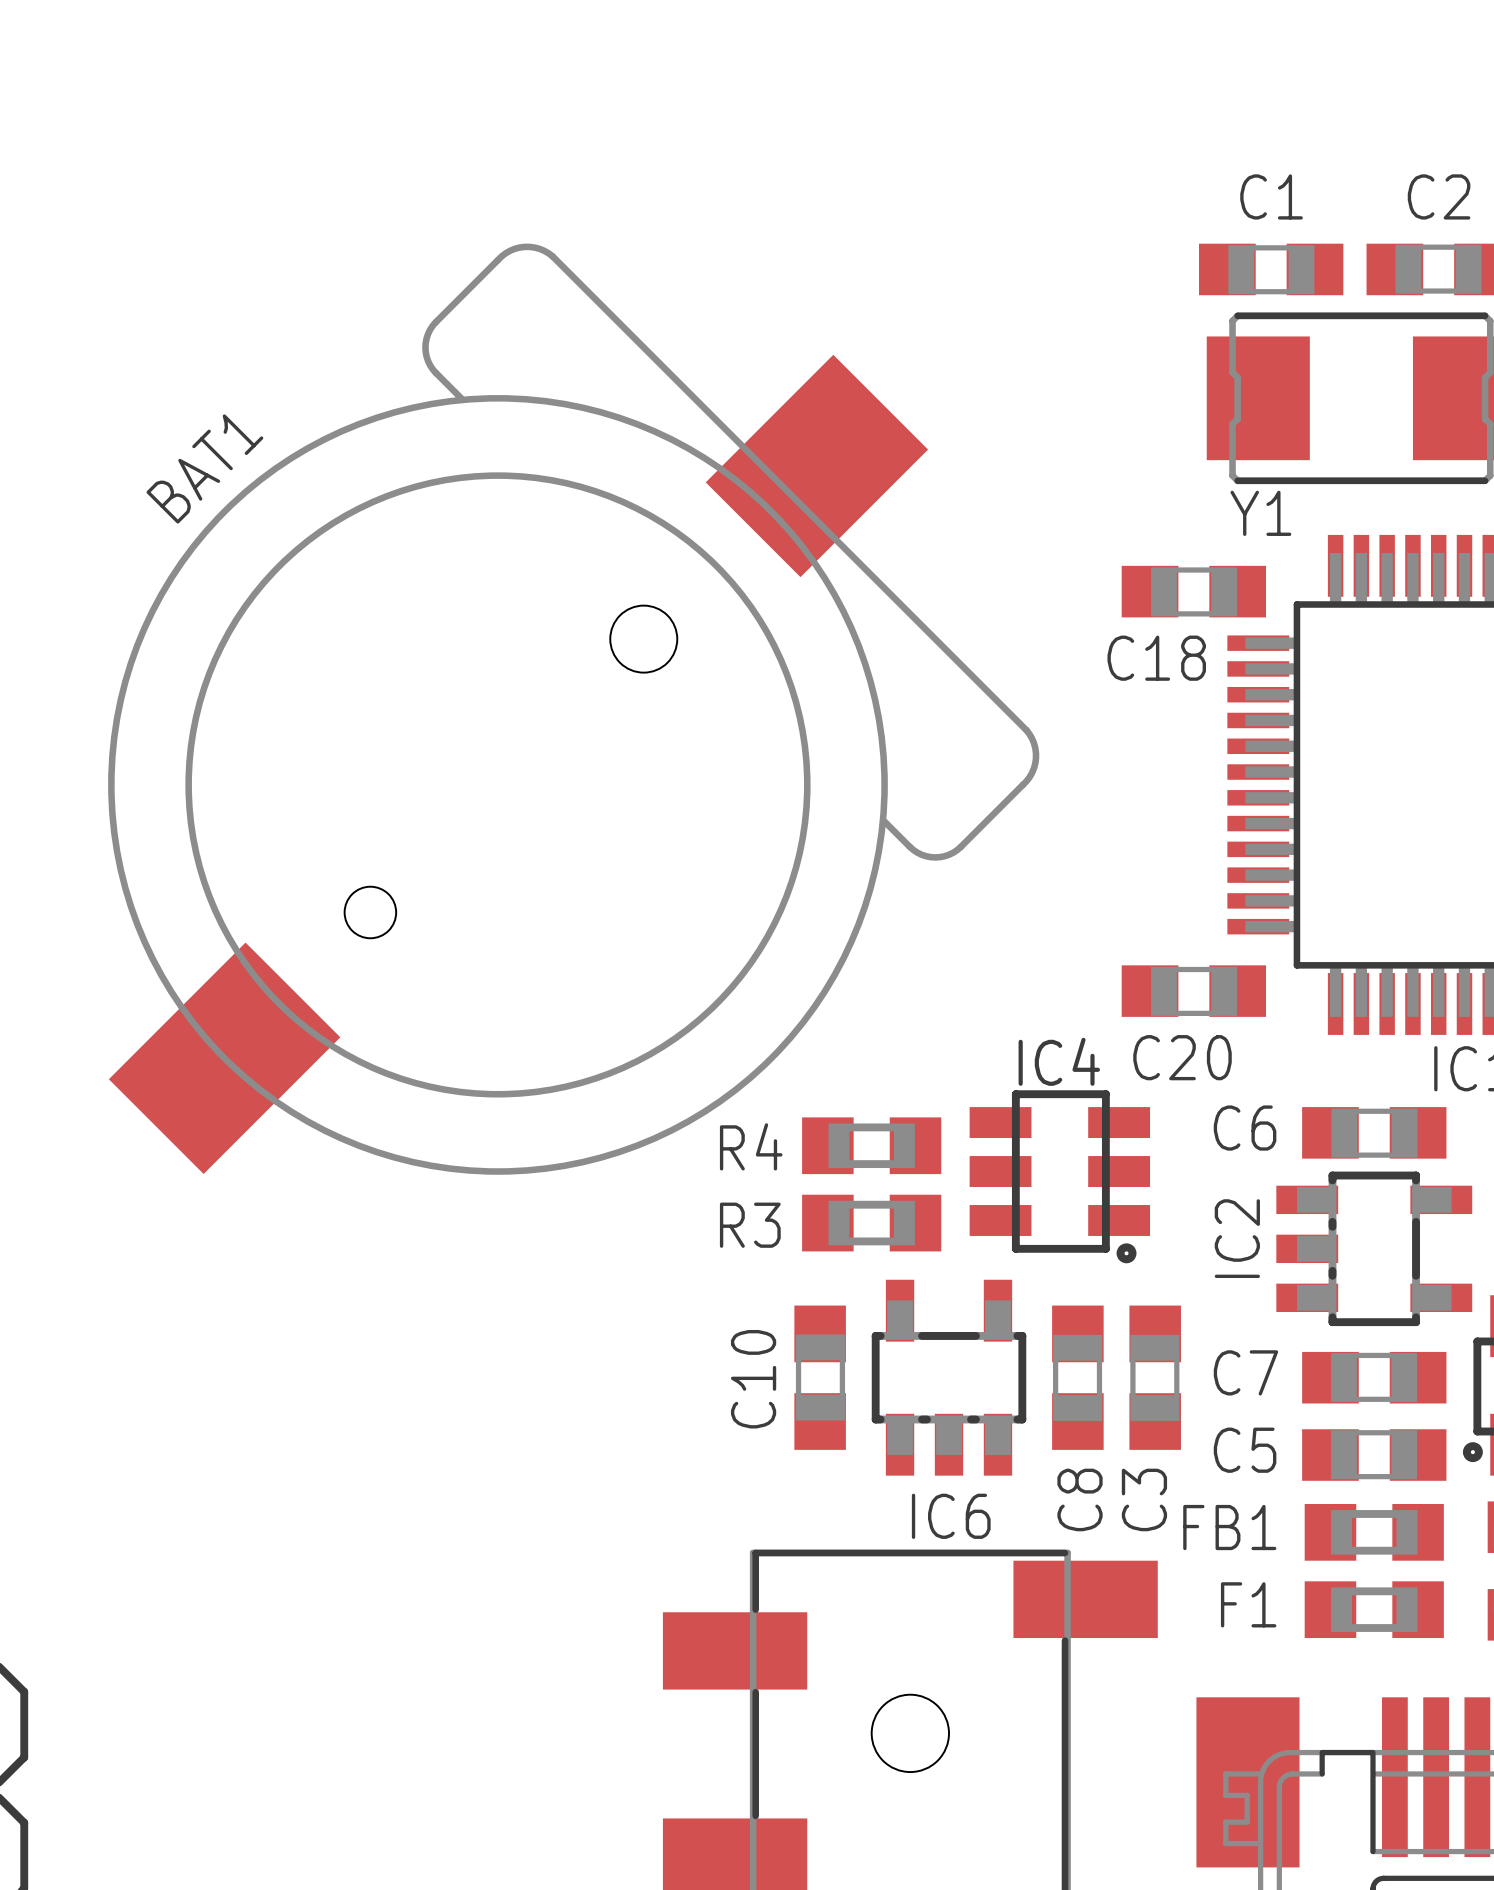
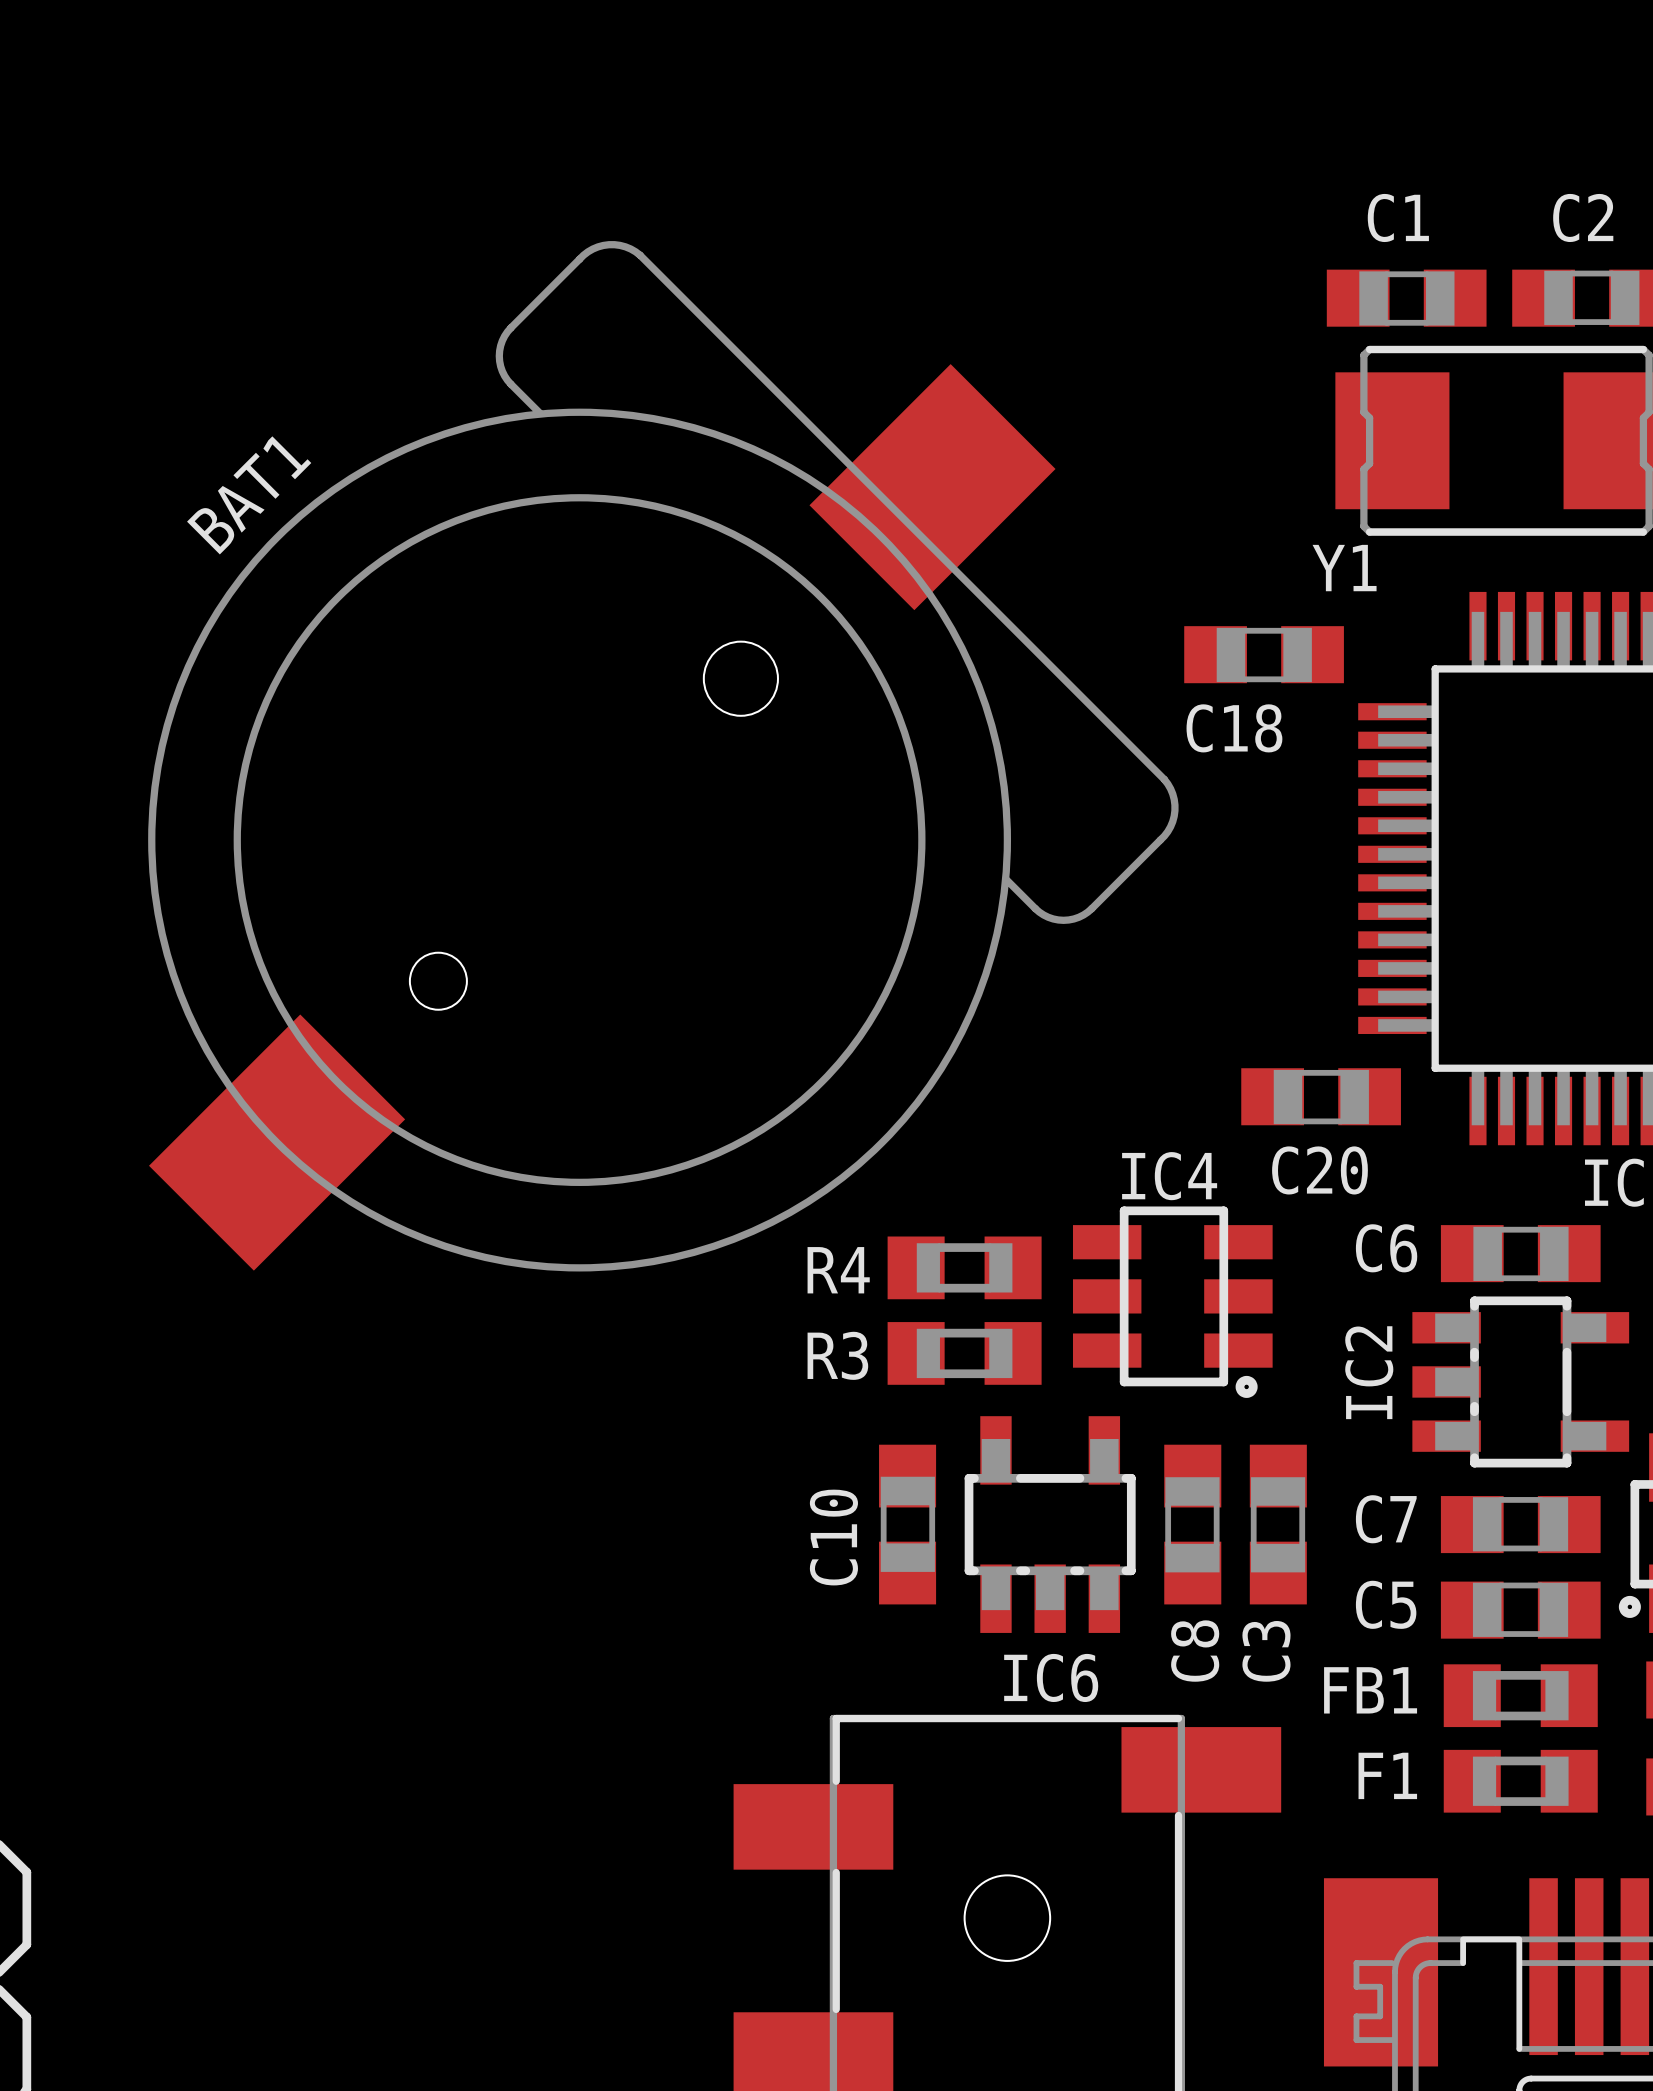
Y1 name position: Y1 (1260, 513) -> Y1 (1344, 568)
C18 position: (1193, 591) -> (1264, 654)
BAT1 position: (573, 709) -> (663, 756)

